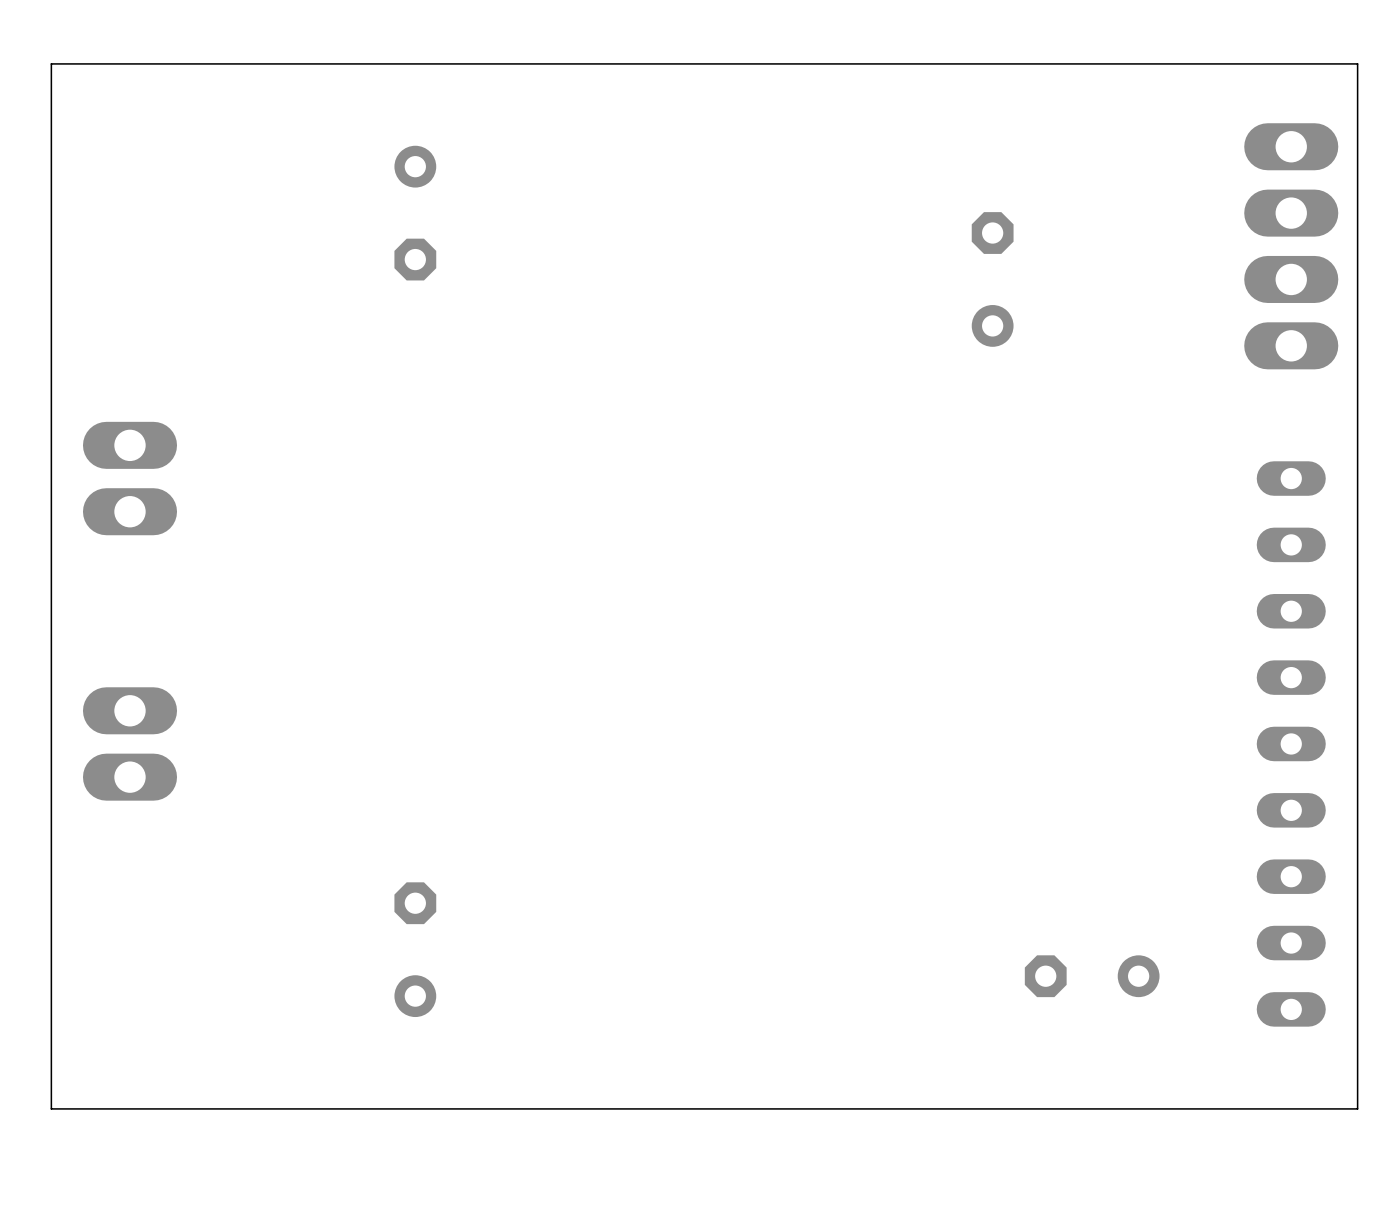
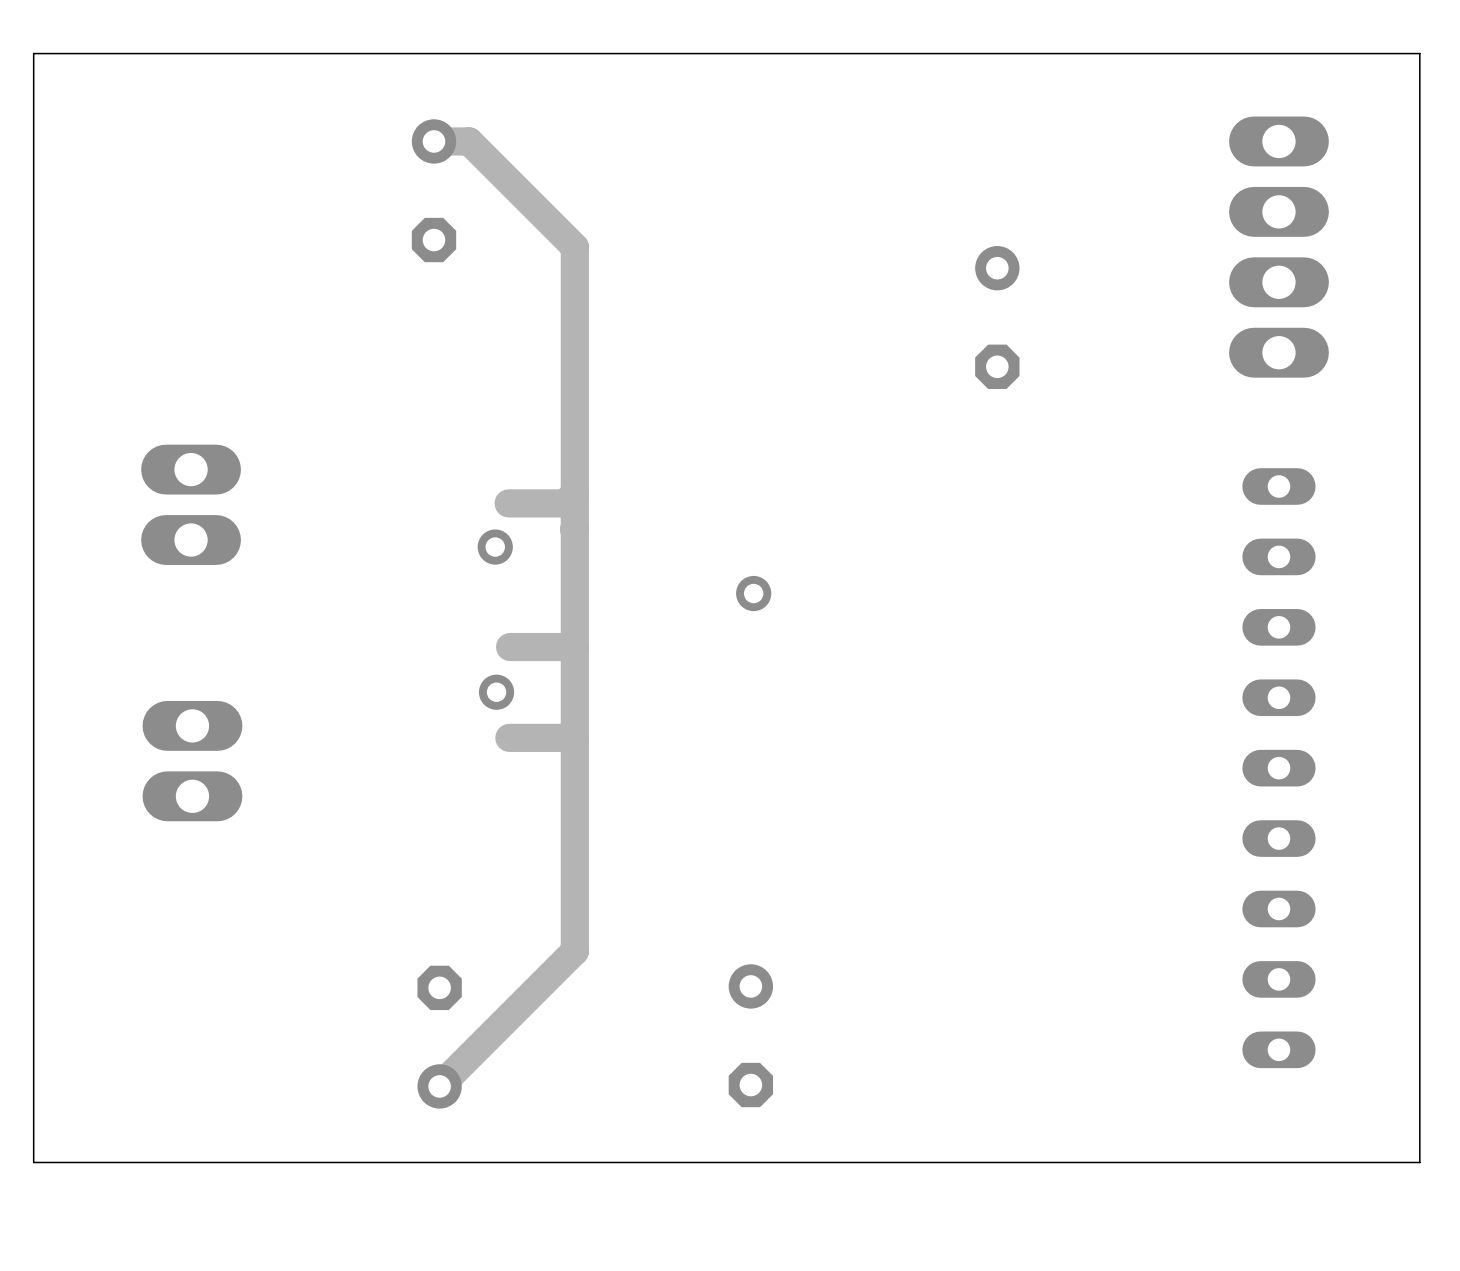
track: none -> (433, 141) (469, 141) (574, 247) (574, 951) (439, 1086)
part position: (415, 213) -> (433, 190)
part position: (1291, 246) -> (1278, 247)
part rotation: 0° (992, 279) -> 180° (997, 317)
part position: (130, 478) -> (191, 504)
track: none -> (574, 493) (564, 503) (508, 503)
via: none -> (495, 547)
via: none -> (753, 593)
track: none -> (510, 647) (574, 648)
via: none -> (496, 692)
track: none -> (509, 737) (572, 737) (574, 739)
part position: (130, 743) -> (192, 761)
part position: (1291, 743) -> (1278, 768)
part position: (415, 949) -> (439, 1037)
part: (1092, 976) -> none
part: none -> (750, 1035)

